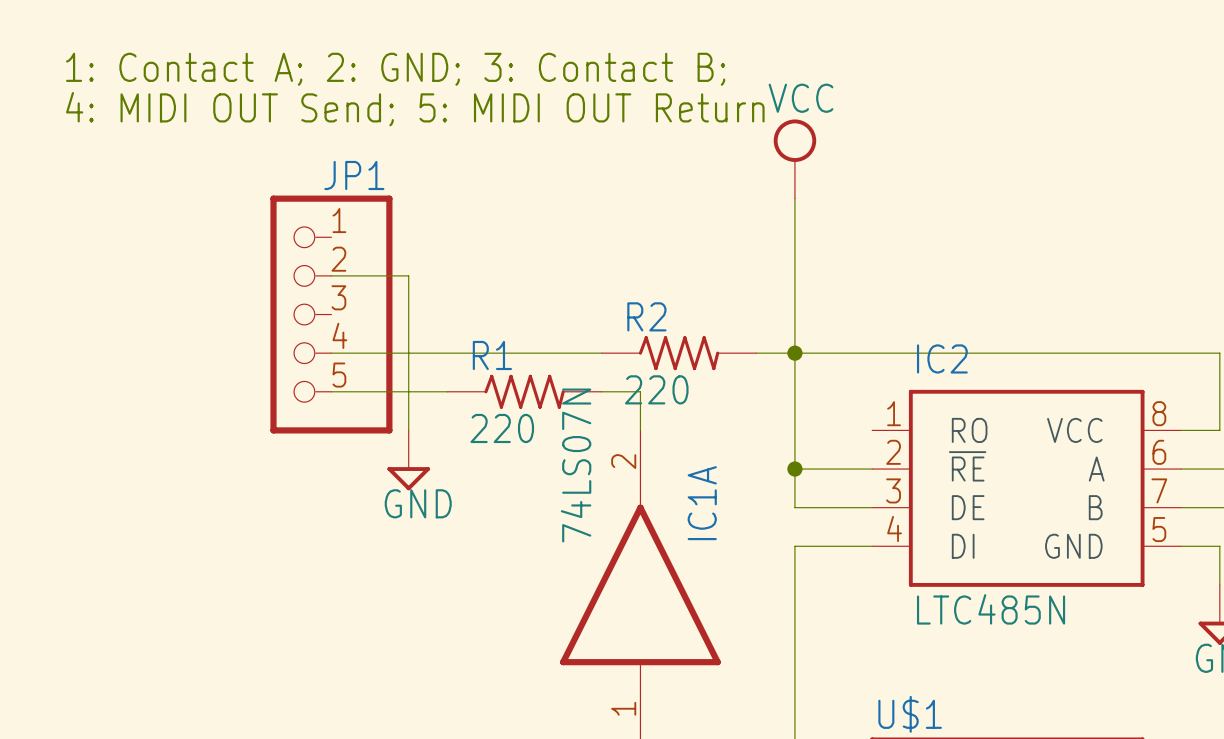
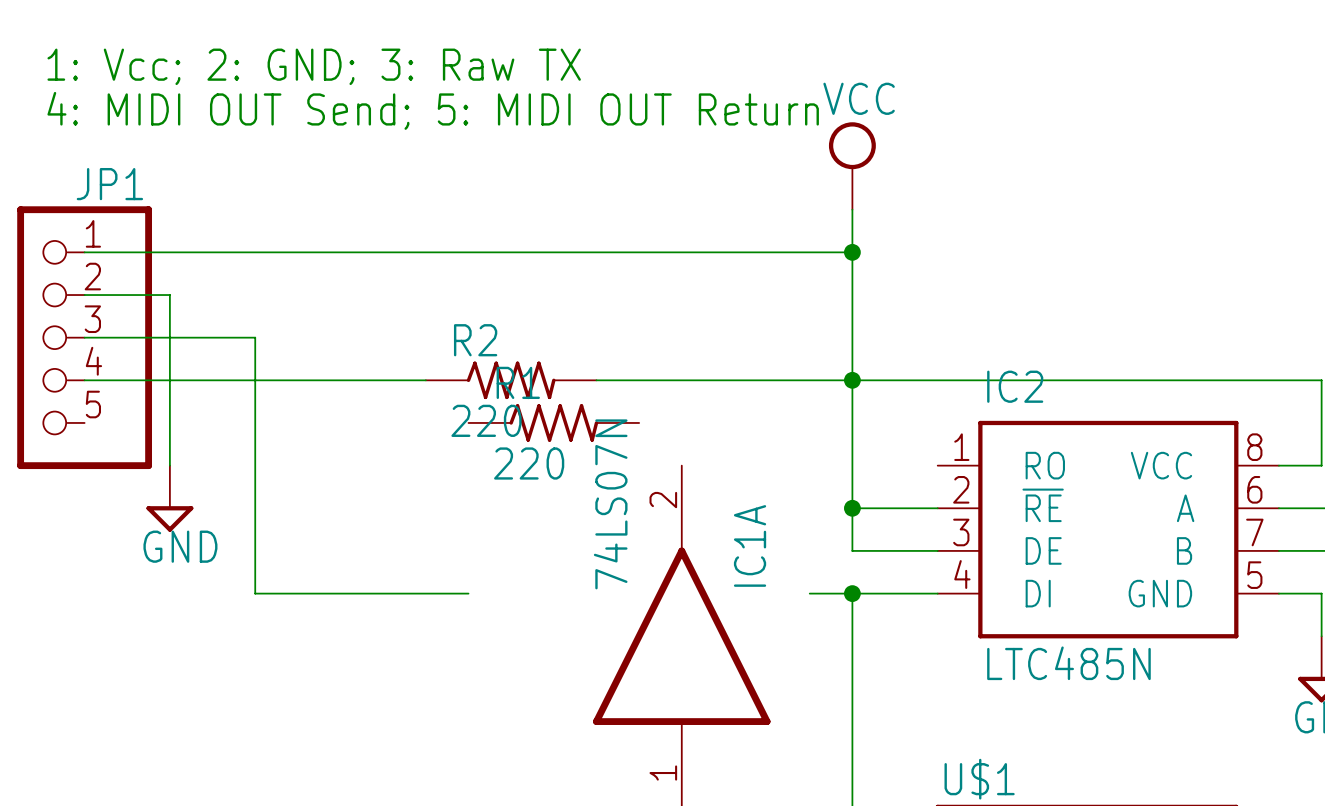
text: 1: Contact A; 2: GND; 3: Contact B; (395, 69) -> 1: Vcc; 2: GND; 3: Raw TX (314, 66)
wire: none -> (84, 252) (852, 252)
junction: none -> (852, 252)
wire: (331, 275) (408, 275) (408, 430) -> (84, 295) (169, 295) (169, 465)
wire: none -> (84, 337) (255, 337) (255, 593) (468, 593)
JP1 position: (331, 314) -> (84, 337)
wire: none -> (84, 380) (340, 380)
R2 position: (679, 353) -> (511, 380)
wire: (331, 391) (447, 391) -> none
wire: (601, 391) (640, 391) (640, 430) -> none
power symbol position: GND (408, 460) -> GND (169, 498)
wire: none -> (809, 593) (852, 593)
junction: none -> (852, 593)

